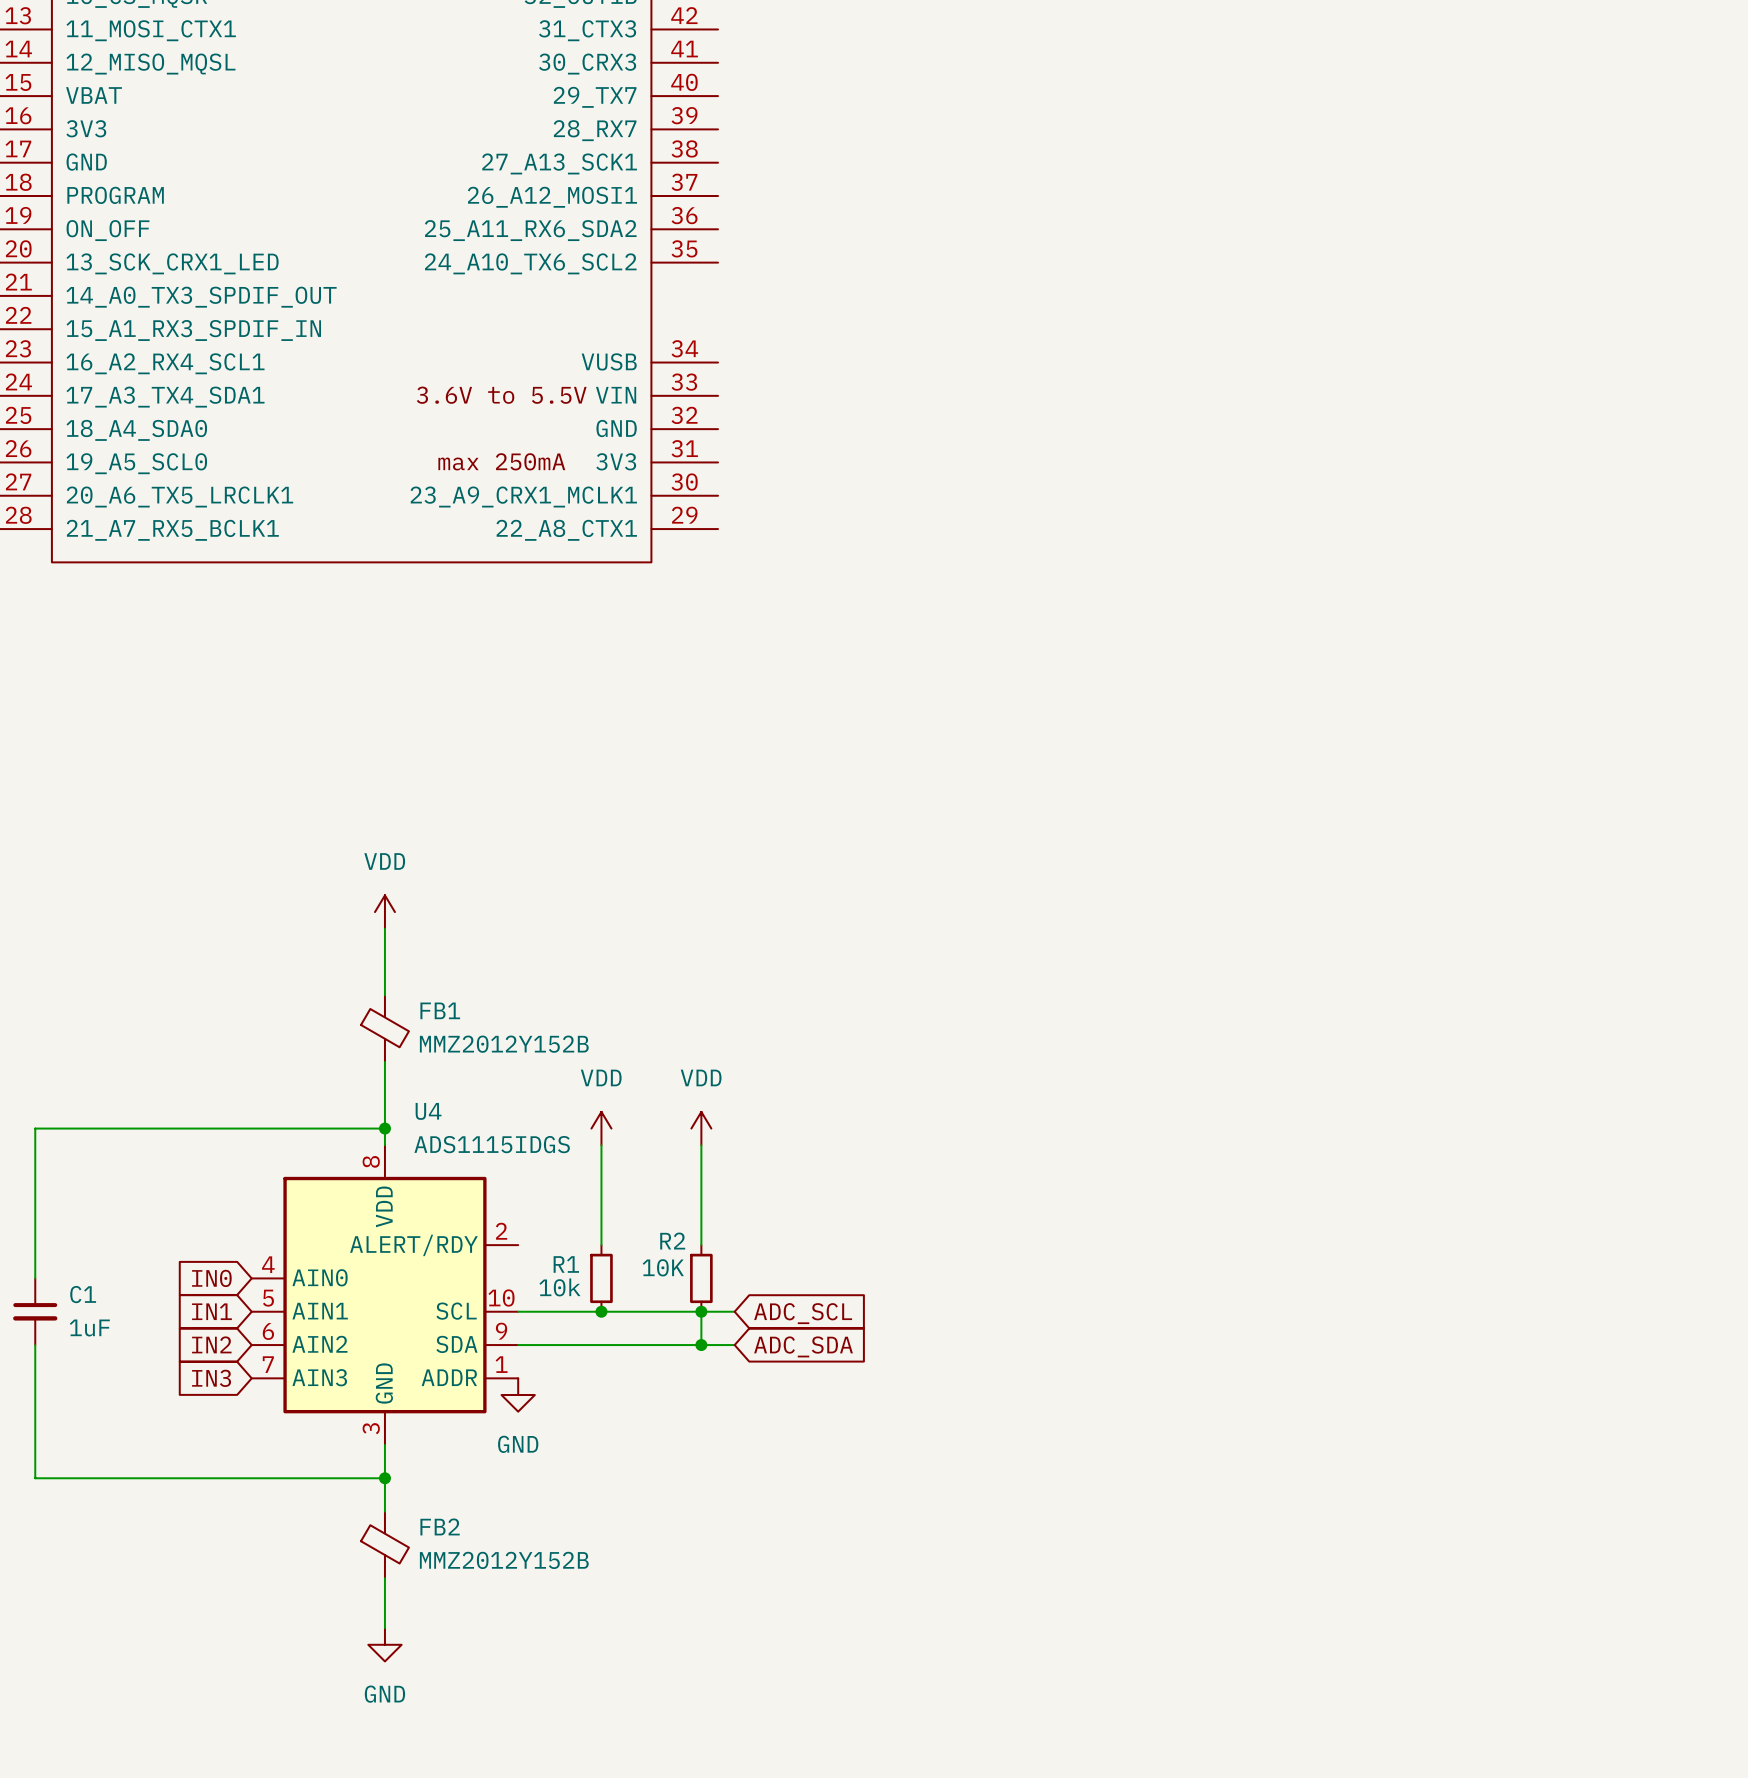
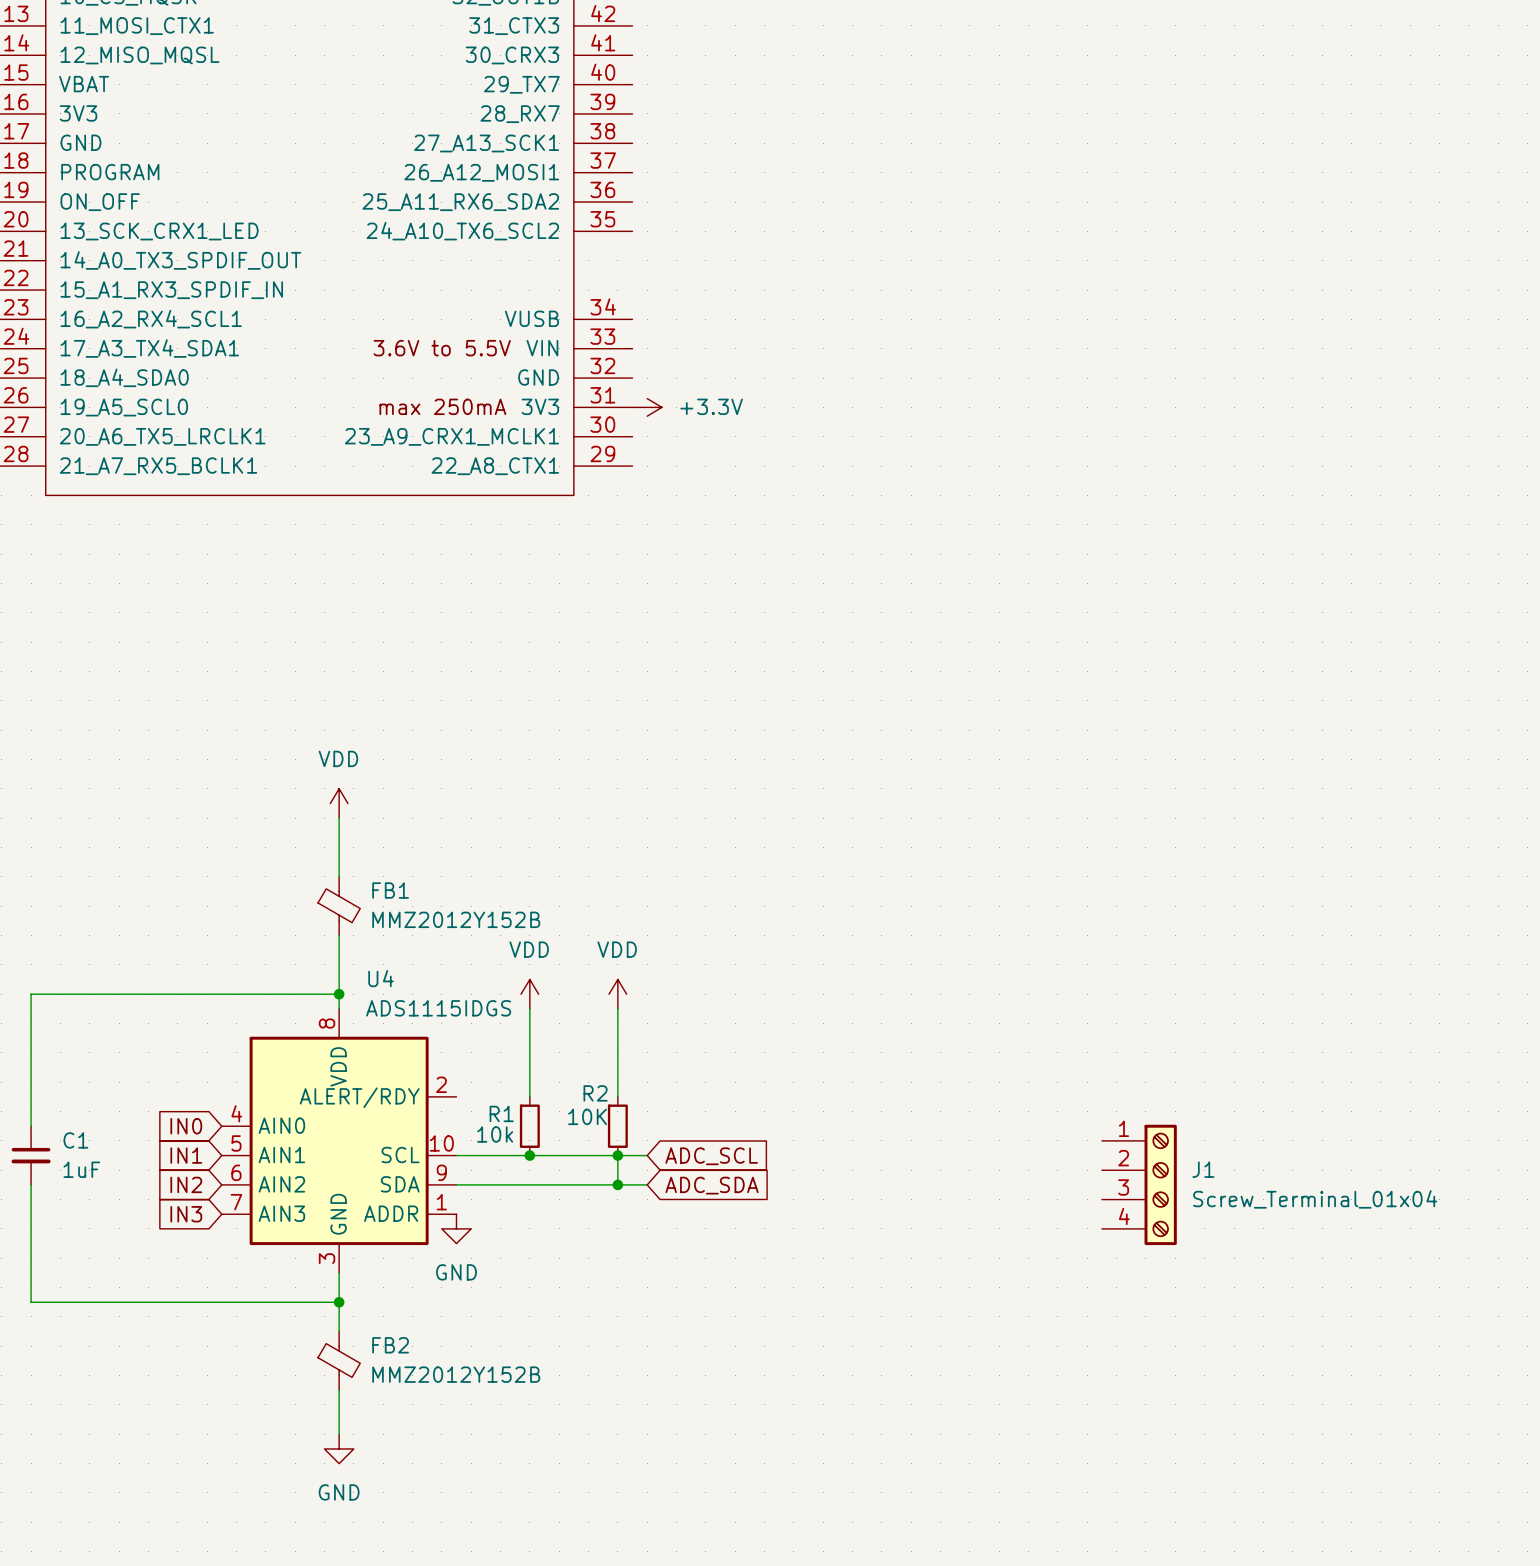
power symbol: none -> +3.3V (647, 407)
J1: none -> Screw_Terminal_01x04 (1139, 1184)

